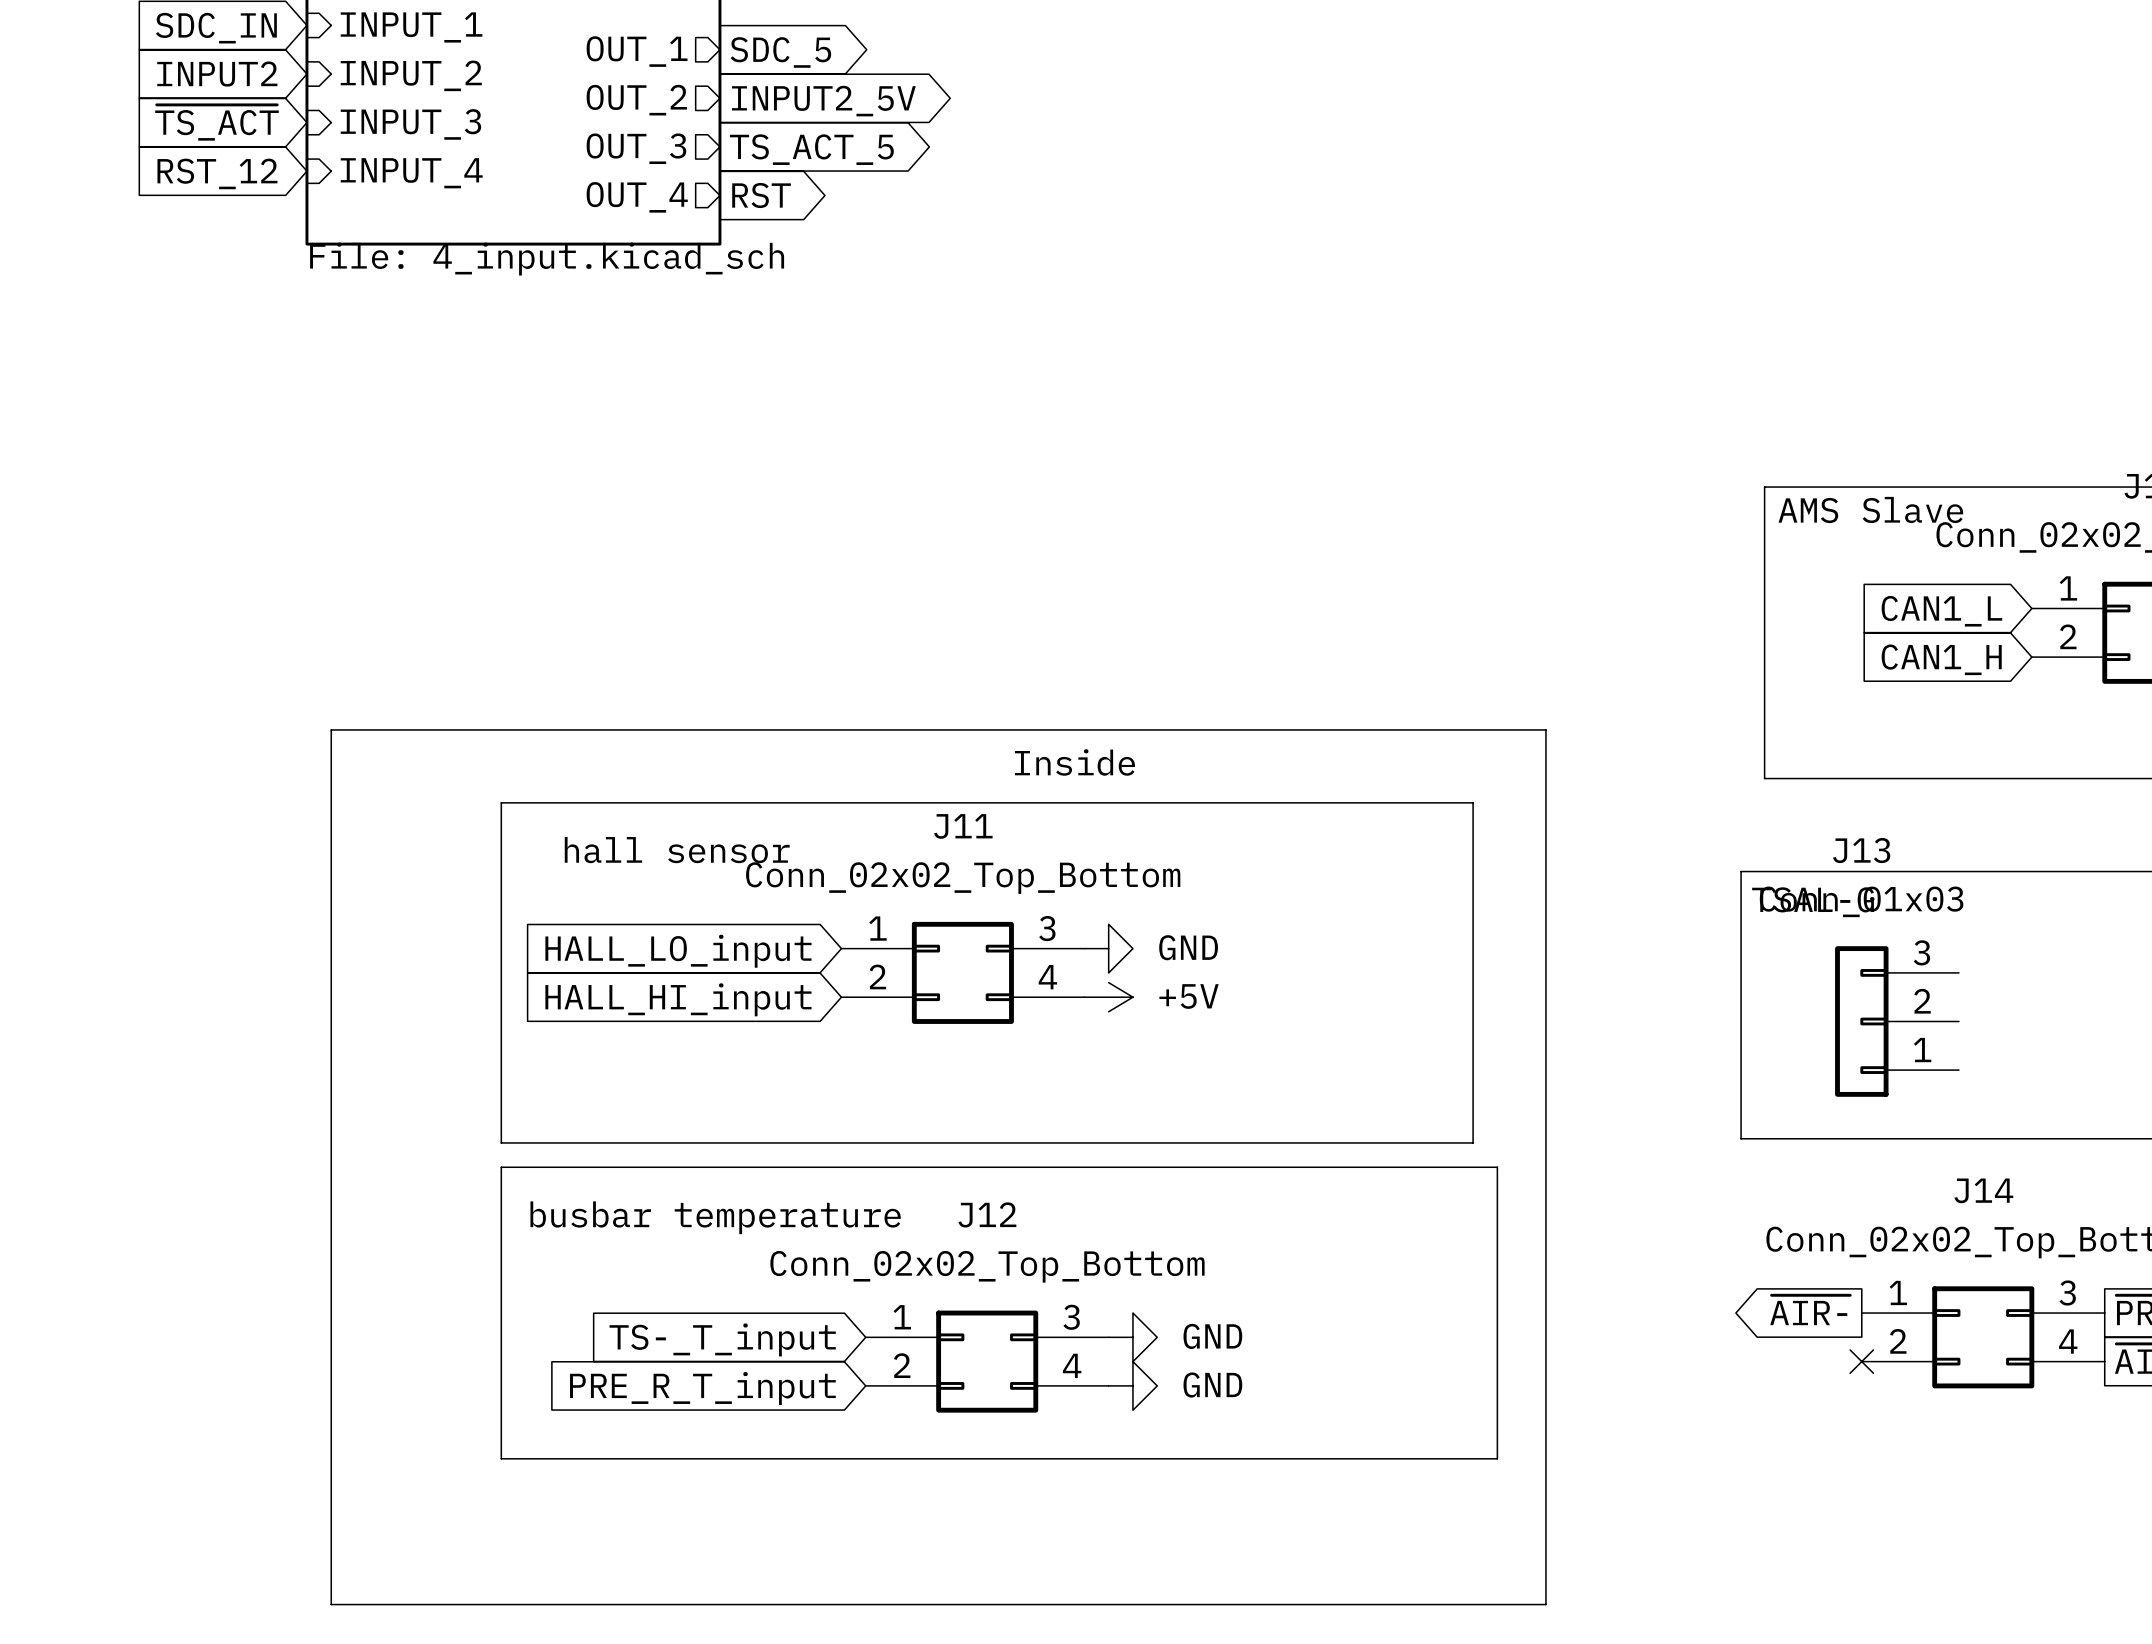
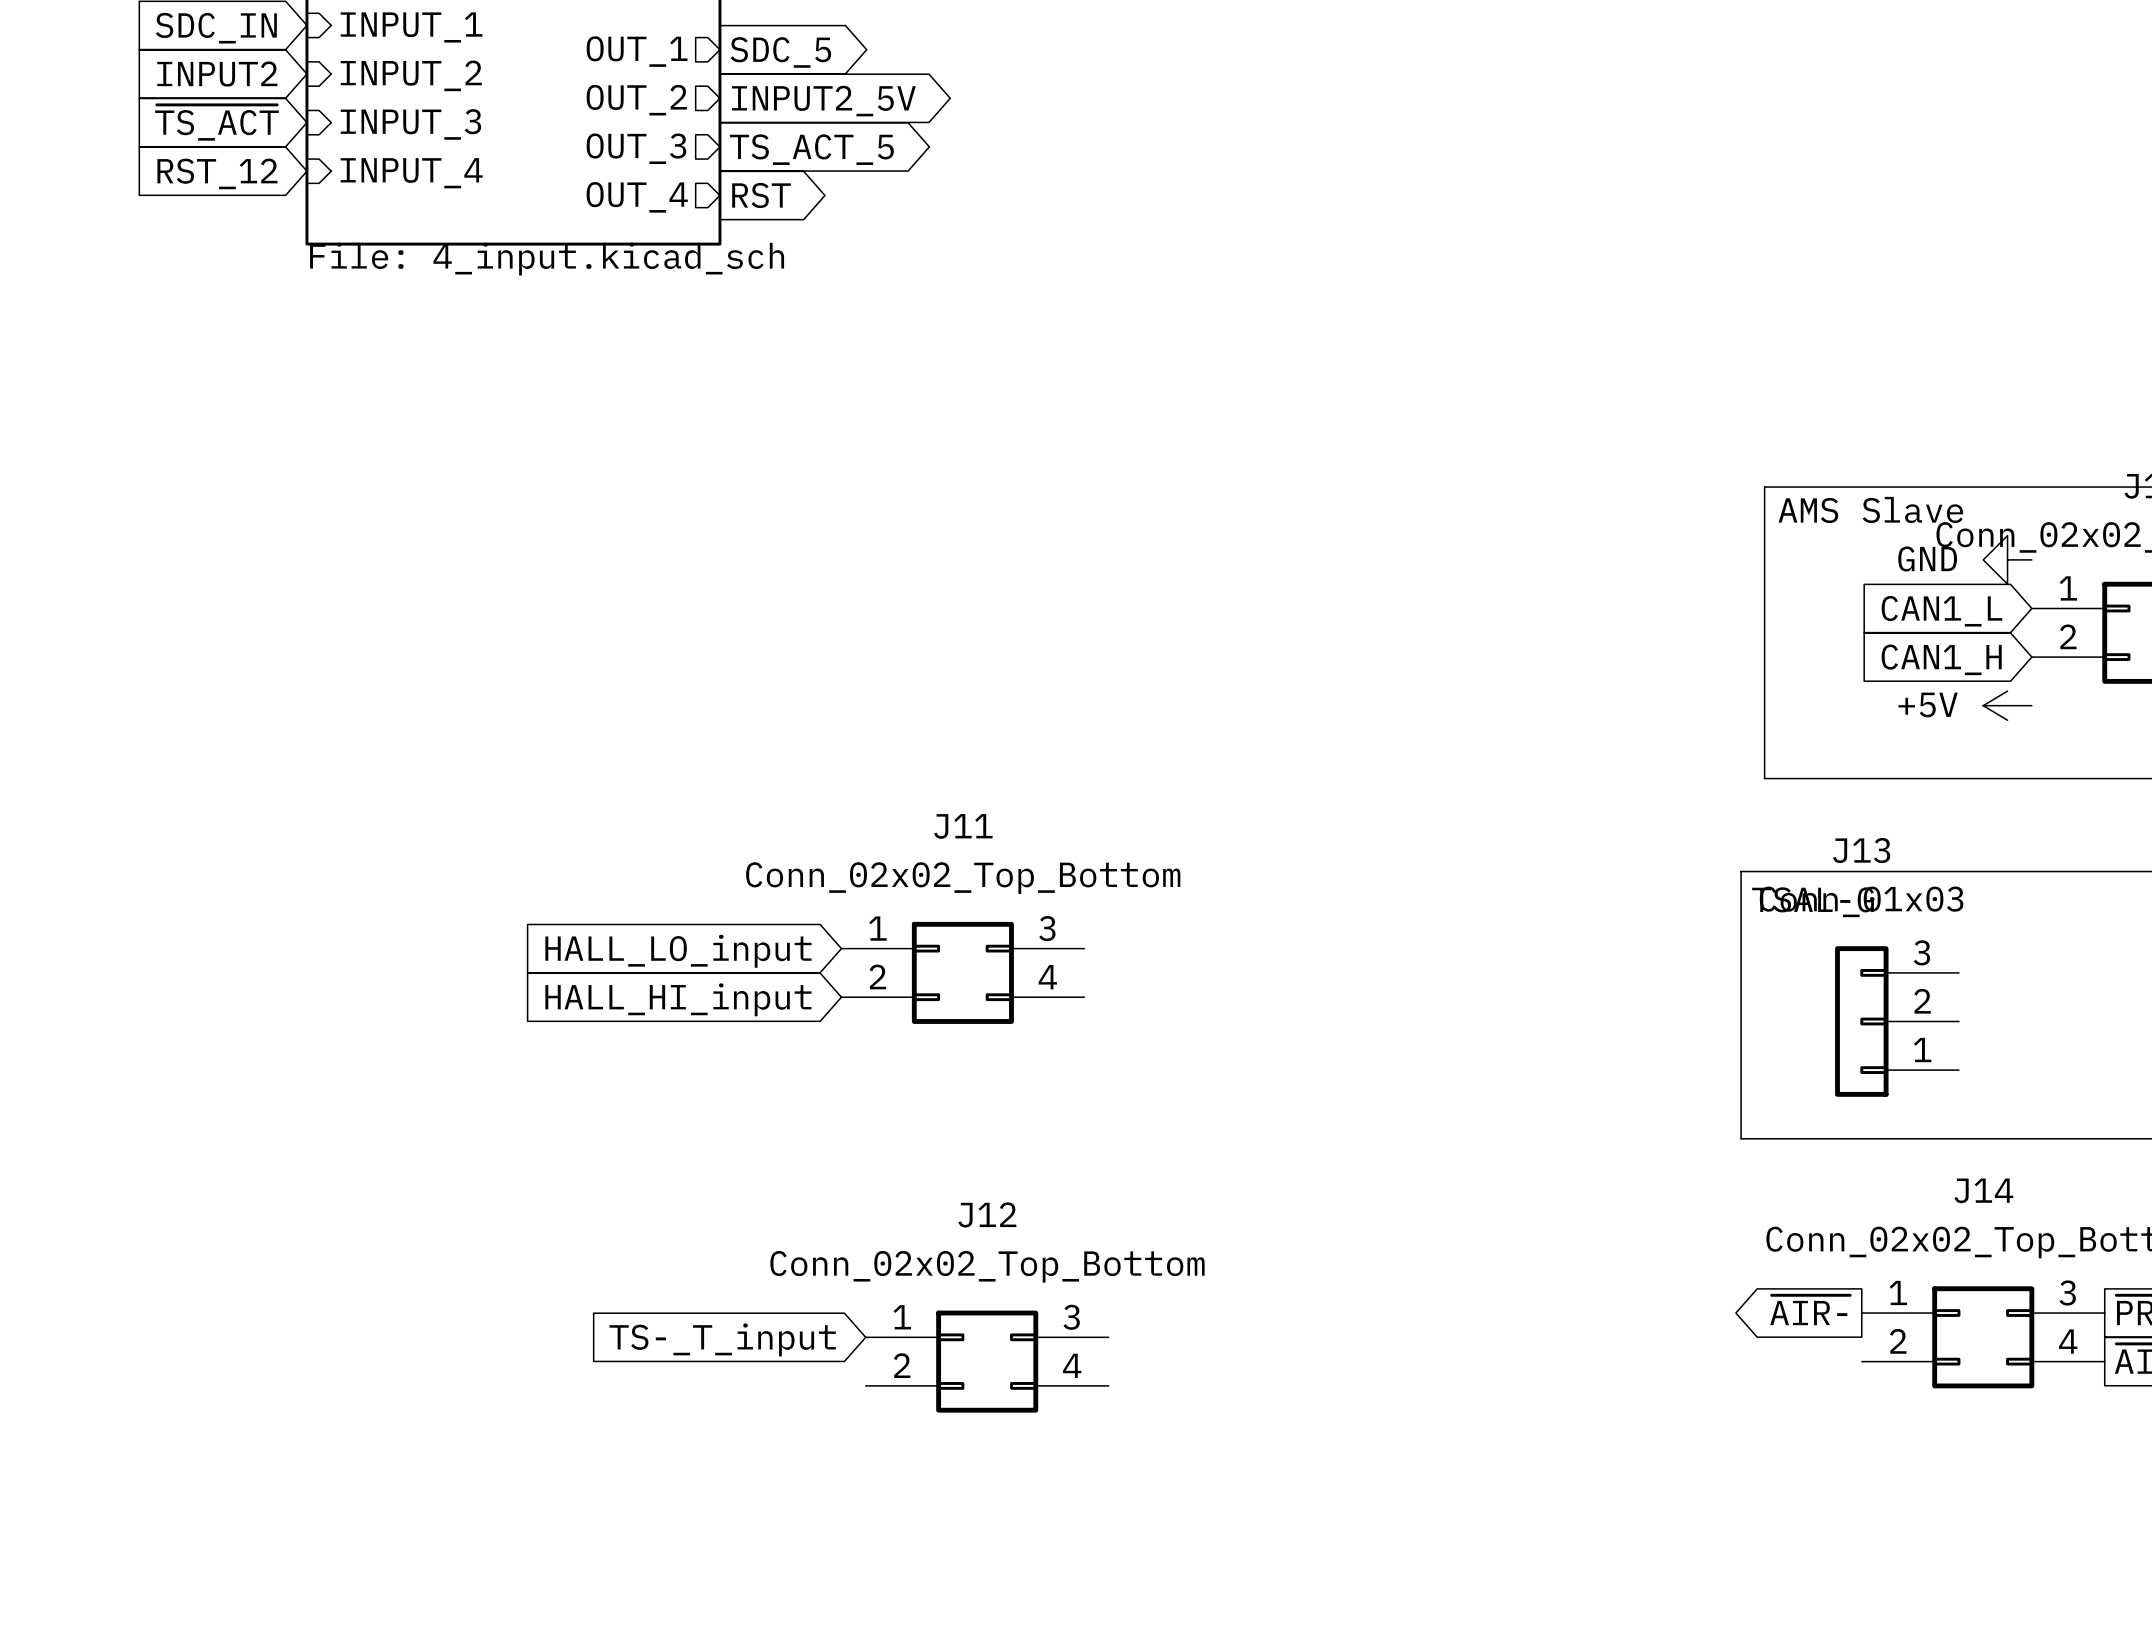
power symbol: none -> GND (2007, 559)
power symbol: none -> +5V (2007, 705)
line: (331, 729) (1545, 729) (1545, 1604) (331, 1604) (331, 729) -> none
text: Inside (1074, 762) -> none
line: (501, 802) (501, 1142) (1473, 1142) (1473, 802) (501, 802) -> none
text: hall sensor (677, 850) -> none
power symbol: GND (1108, 948) -> none
power symbol: +5V (1108, 997) -> none
line: (501, 1167) (1497, 1167) (1497, 1458) (501, 1458) (501, 1167) -> none
text: busbar temperature (715, 1217) -> none
power symbol: GND (1132, 1337) -> none
no-connect mark: (1861, 1361) -> none
power symbol: GND (1132, 1385) -> none
global label: PRE_R_T_input (702, 1388) -> none

